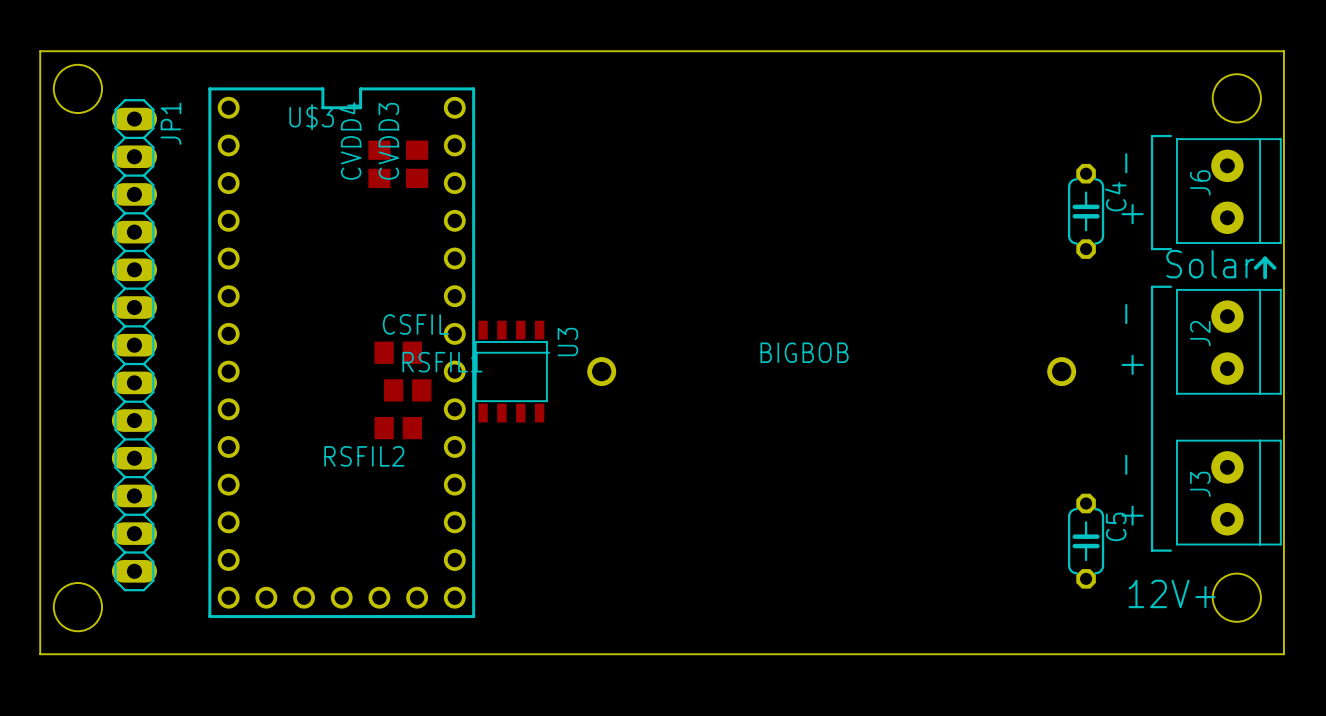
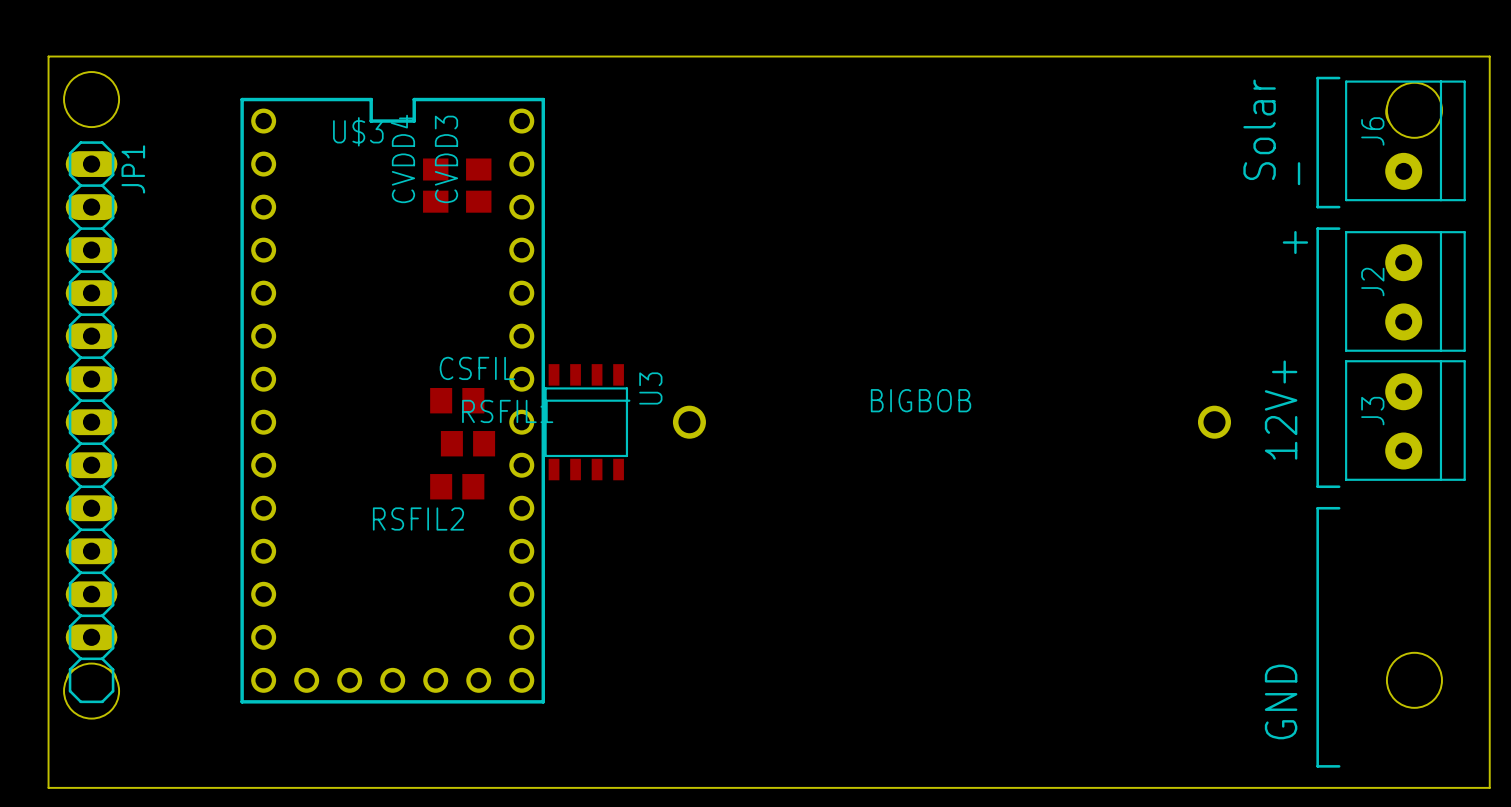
board edge: (1283, 51) (1283, 654) (40, 654) -> (1468, 56) (1489, 56) (1489, 787) (48, 787) (48, 744)
line: (1152, 136) (1170, 136) -> (1317, 153) (1317, 78) (1339, 78)
text position: _ (1126, 163) -> _ (1299, 173)
line: (1152, 183) (1152, 201) -> (1317, 207) (1339, 207)
J6 position: (1228, 191) -> (1405, 140)
C4: (1086, 211) -> none
line: (1152, 249) (1170, 249) -> (1317, 282) (1317, 325)
line: (1265, 258) (1265, 277) -> none
line: (1265, 258) (1274, 267) -> none
line: (1265, 258) (1255, 267) -> none
text rotation: 0° (1210, 264) -> 90° counterclockwise (1259, 129)
text position: Solar (1210, 264) -> Solar (1259, 129)
line: (1152, 286) (1170, 286) -> (1317, 228) (1339, 228)
text: _ (1126, 314) -> none
J2 position: (1228, 341) -> (1405, 291)
JP1 position: (134, 345) -> (91, 422)
text: + (1132, 364) -> none
line: (1152, 428) (1152, 446) -> (1317, 486) (1339, 486)
line: none -> (1317, 508) (1339, 508)
text: _ (1126, 464) -> none
J3 position: (1228, 492) -> (1405, 420)
text: + (1132, 515) -> none
C5: (1086, 541) -> none
line: (1152, 550) (1170, 550) -> (1317, 626) (1317, 766) (1339, 766)
text rotation: 0° (1172, 593) -> 90° counterclockwise (1281, 410)
text position: 12V+ (1172, 593) -> 12V+ (1281, 410)
text: none -> GND (1281, 701)

